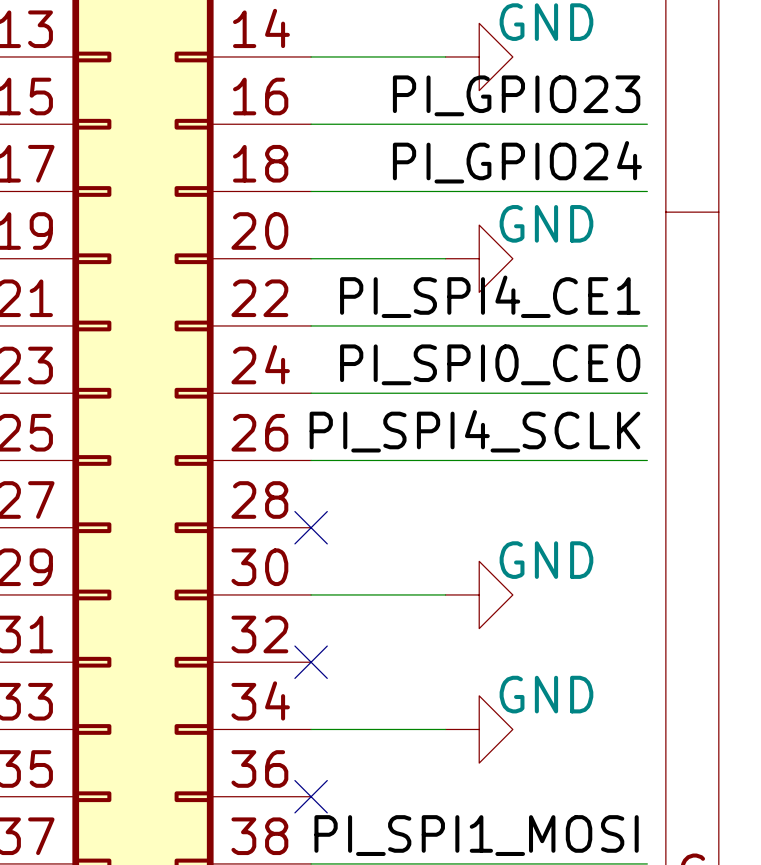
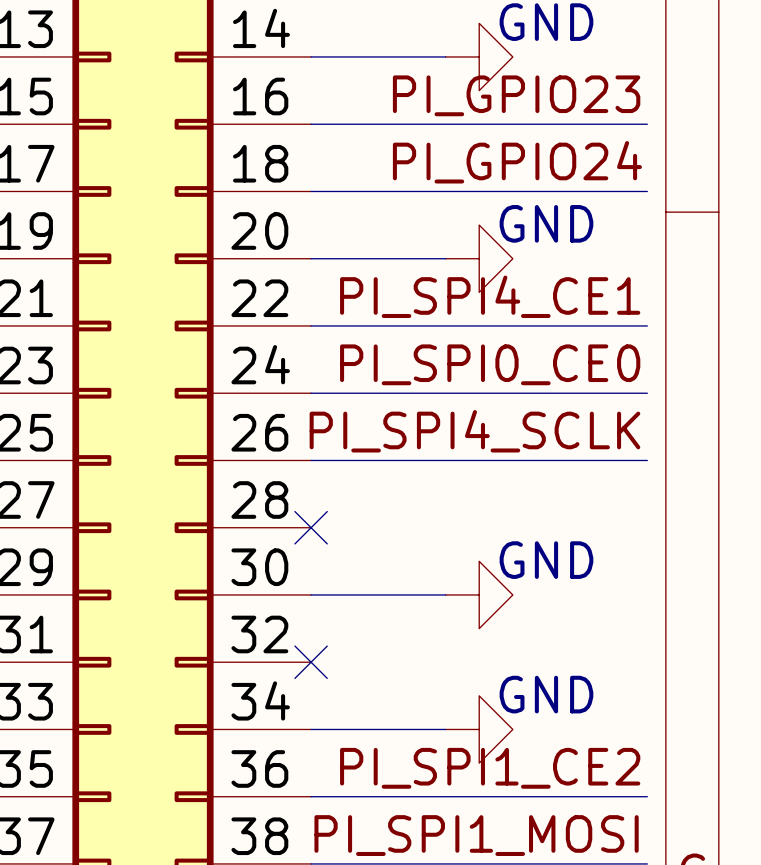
label: none -> PI_SPI1_CE2 (490, 768)
wire: none -> (311, 796) (647, 796)
no-connect mark: (311, 796) -> none

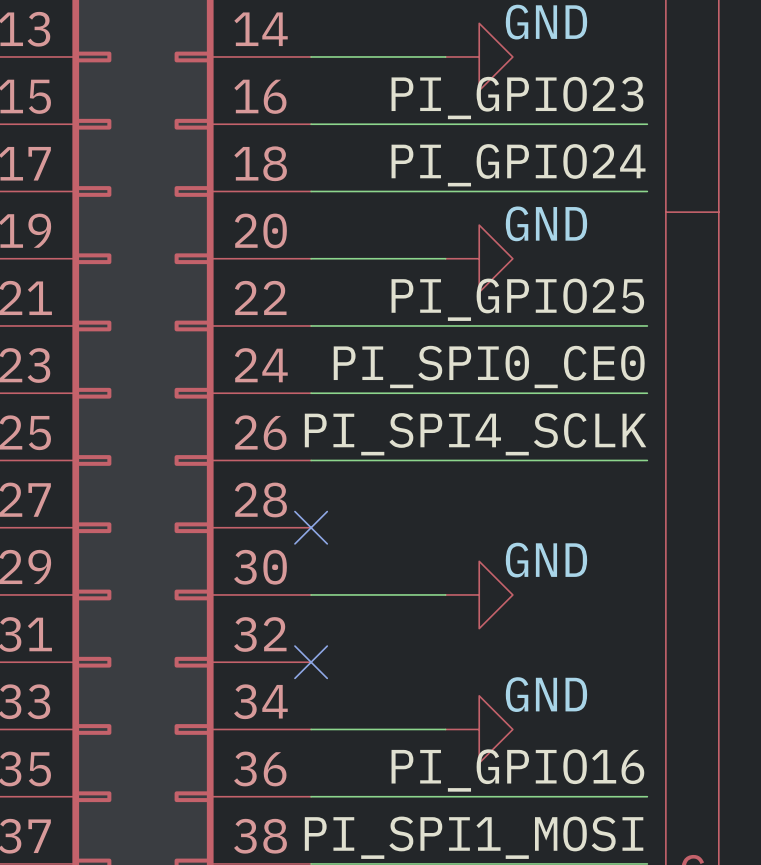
label: PI_SPI4_CE1 (490, 296) -> PI_GPIO25 (517, 299)
label: PI_SPI1_CE2 (490, 768) -> PI_GPIO16 (517, 770)

